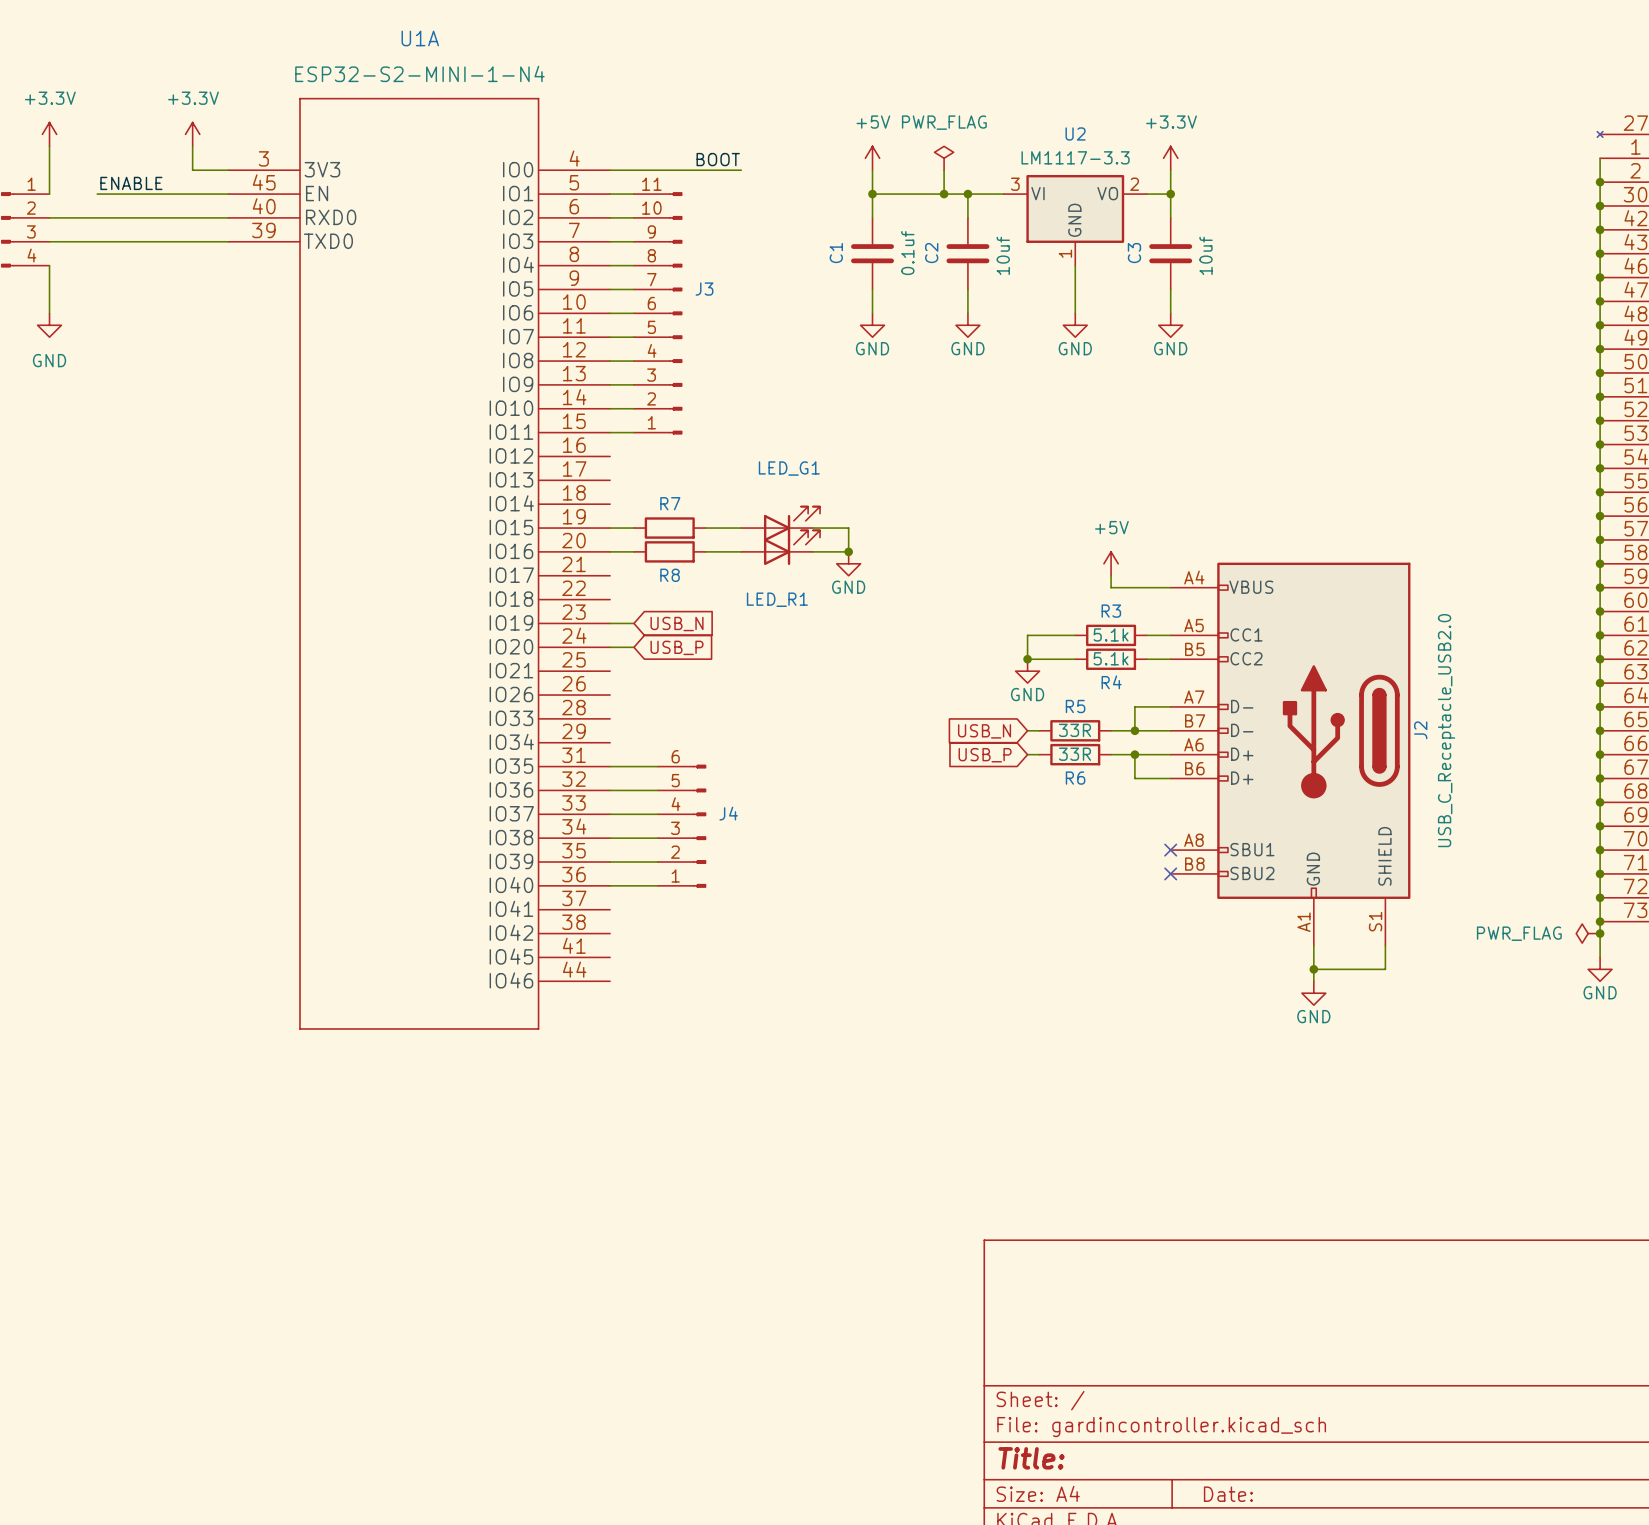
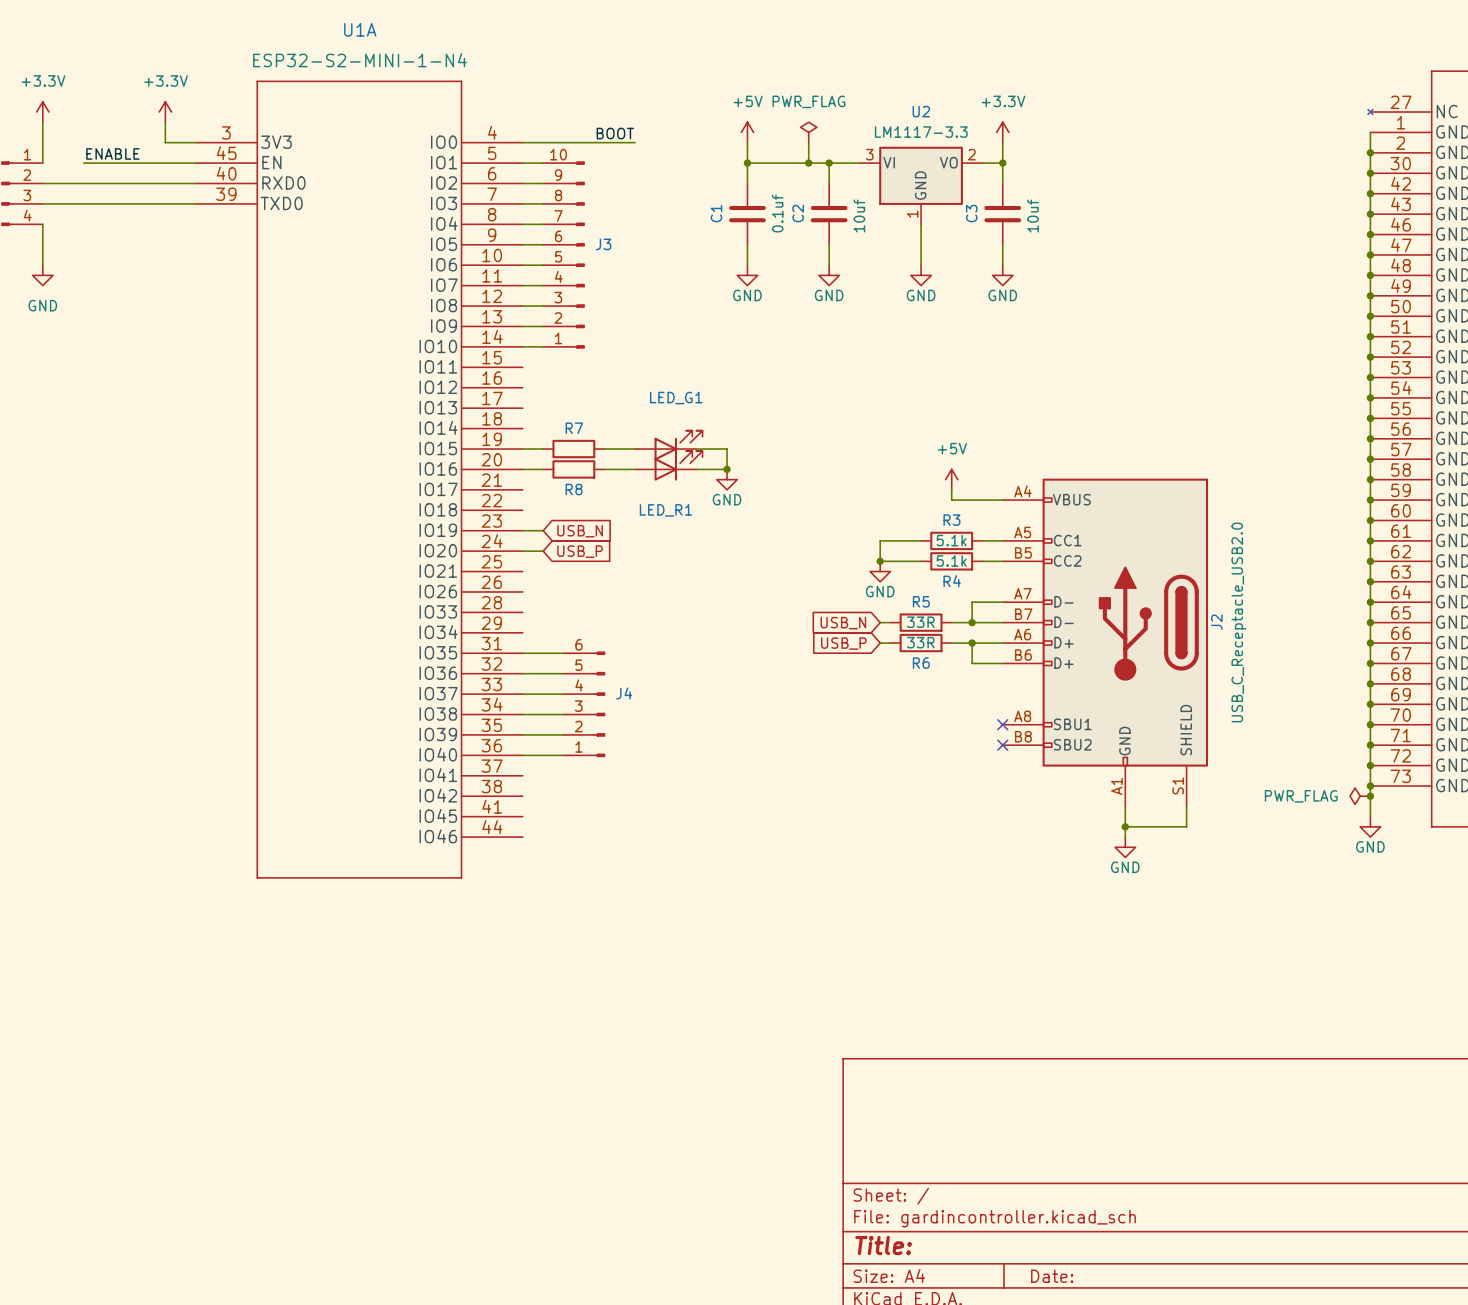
J3 symbol: [633, 192, 683, 435] -> [543, 161, 585, 349]
wire: (610, 432) (633, 432) -> none

